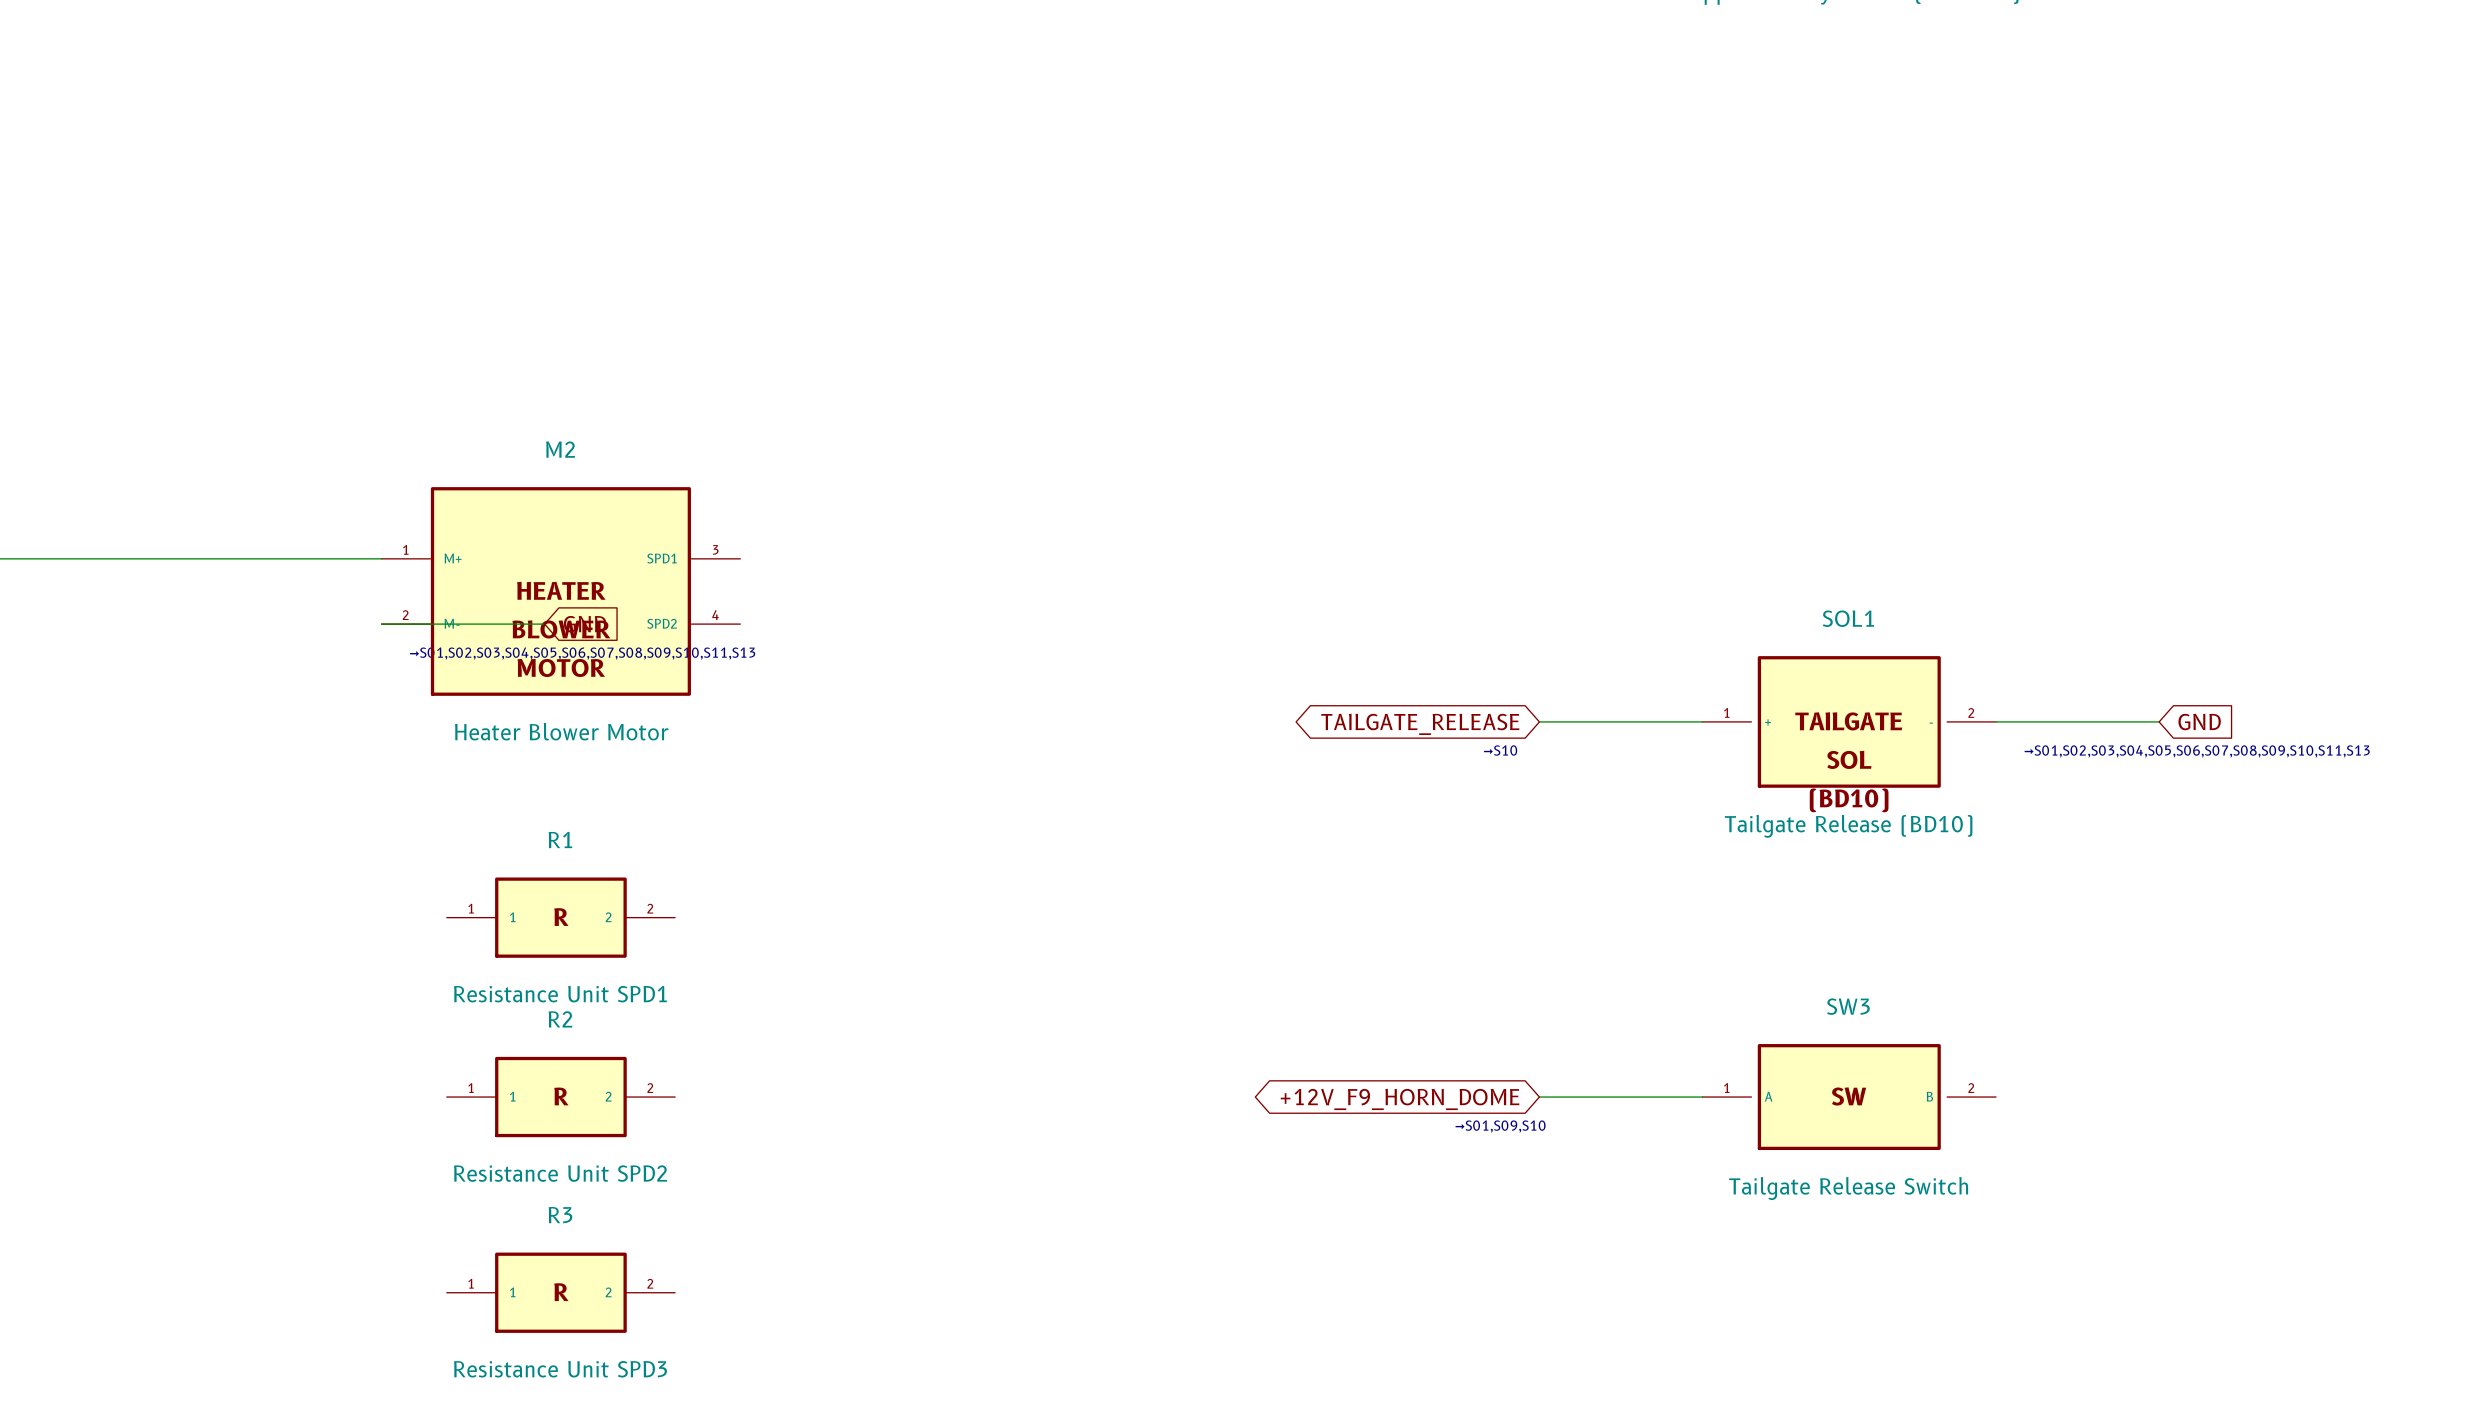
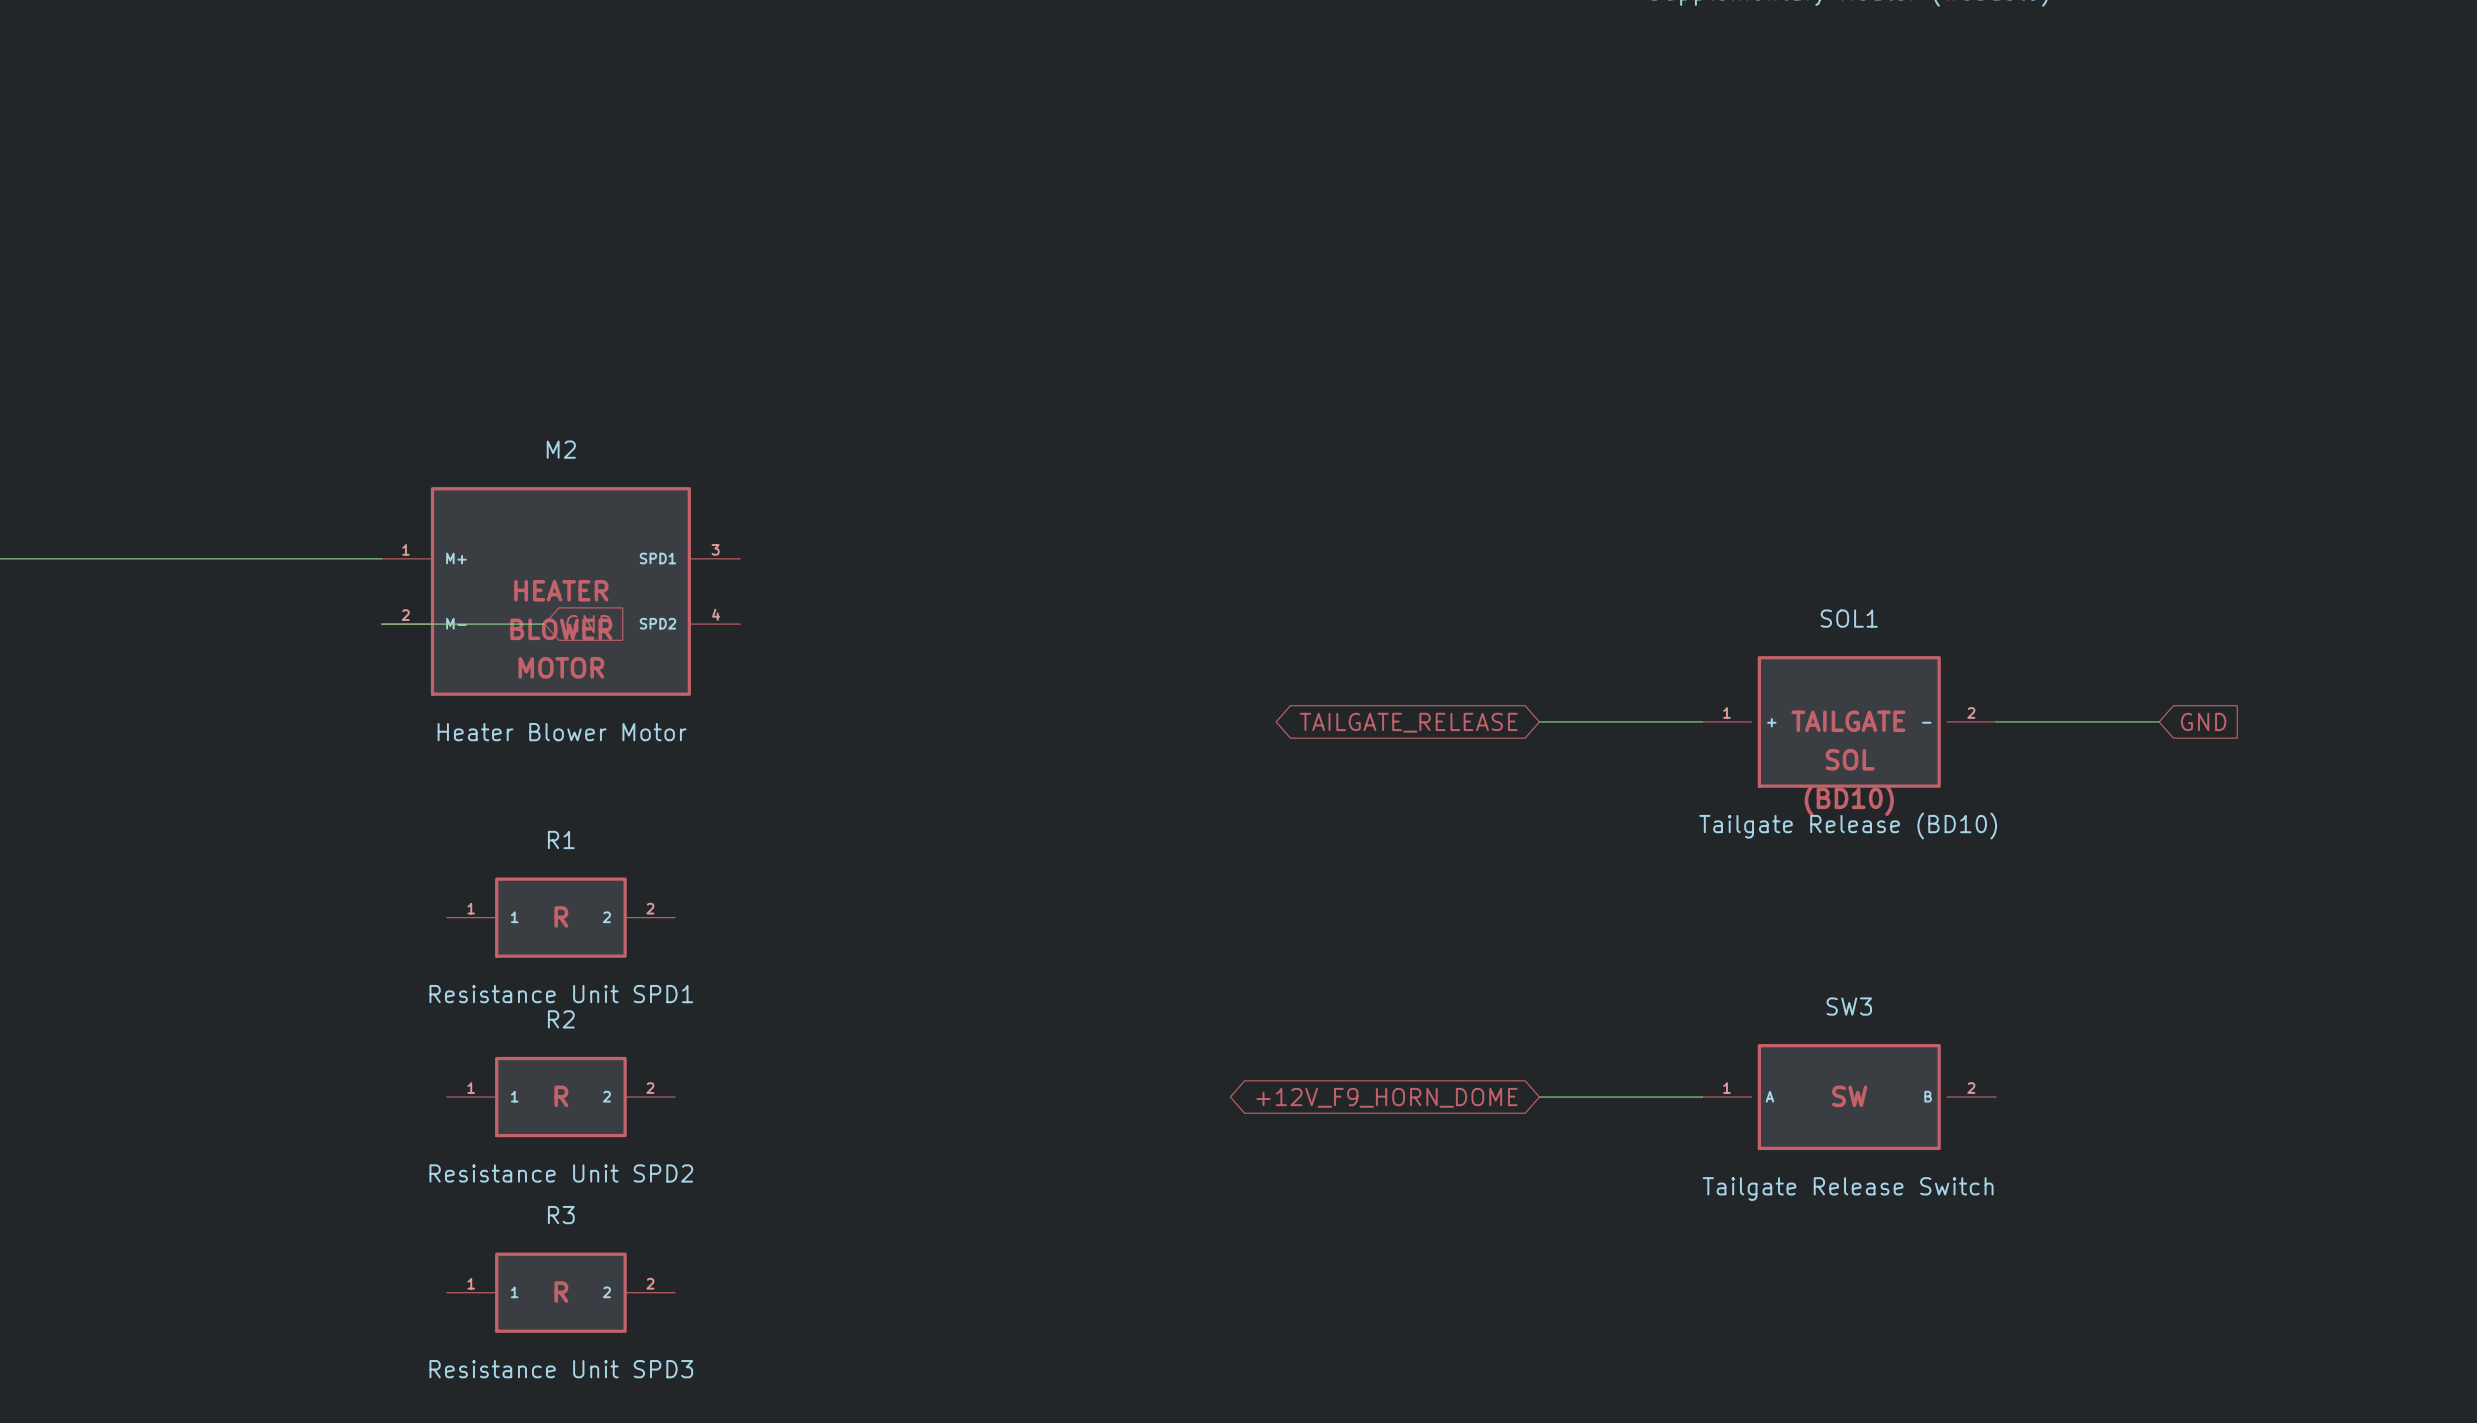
text: →S01,S02,S03,S04,S05,S06,S07,S08,S09,S10,S11,S13 (582, 653) -> none
text: →S10 (1500, 750) -> none
text: →S01,S02,S03,S04,S05,S06,S07,S08,S09,S10,S11,S13 (2197, 751) -> none
text: →S01,S09,S10 (1500, 1126) -> none

